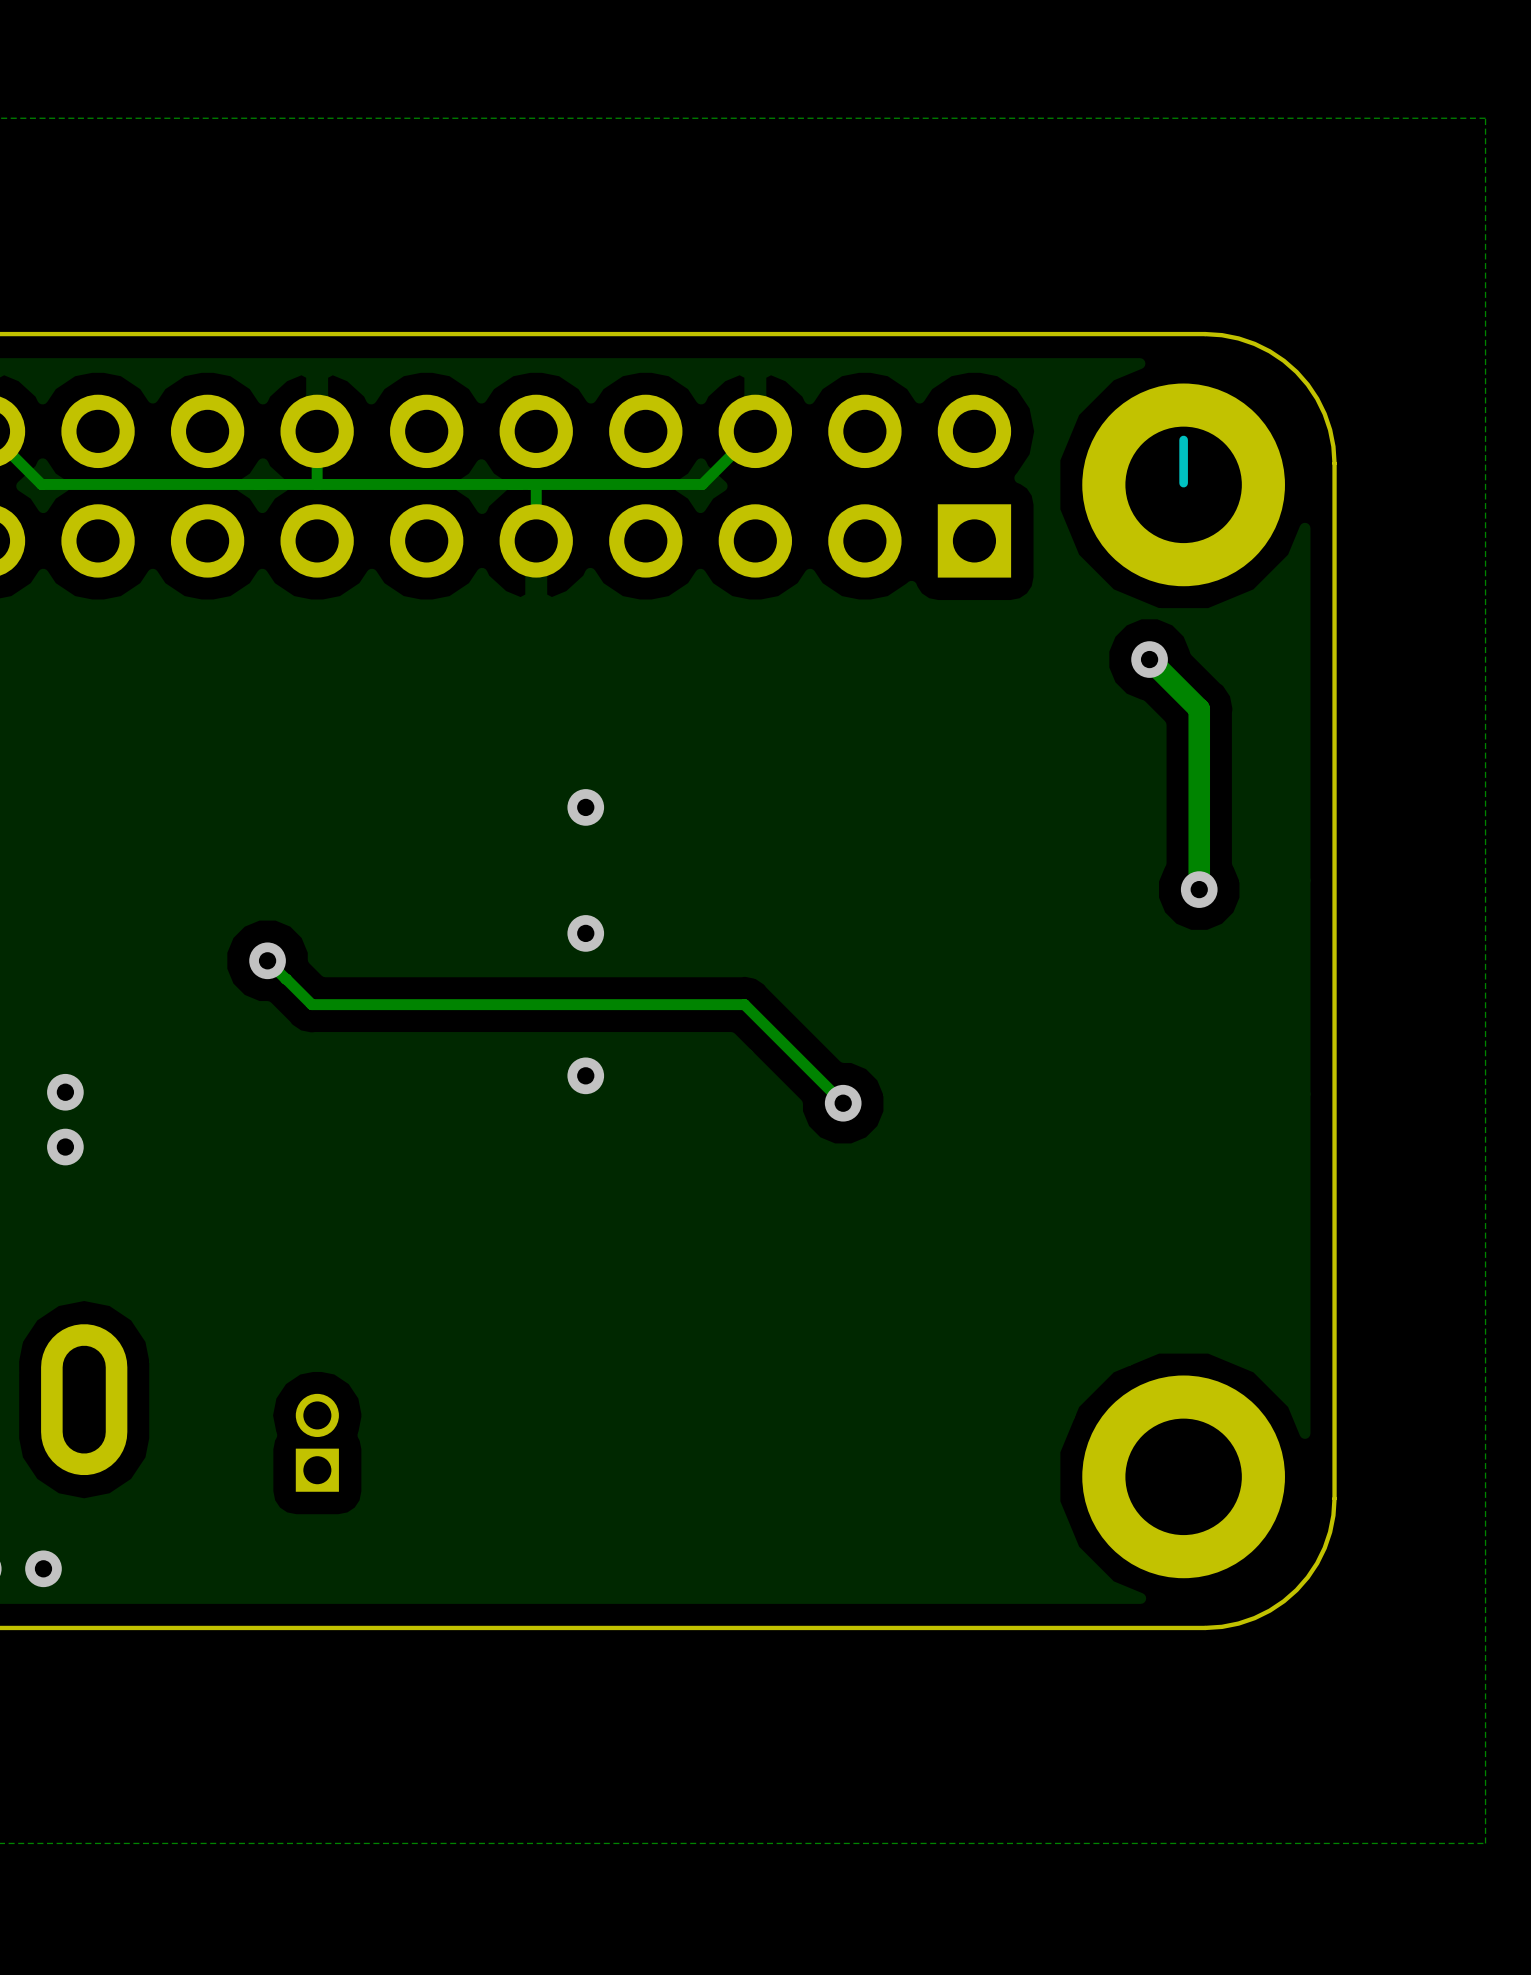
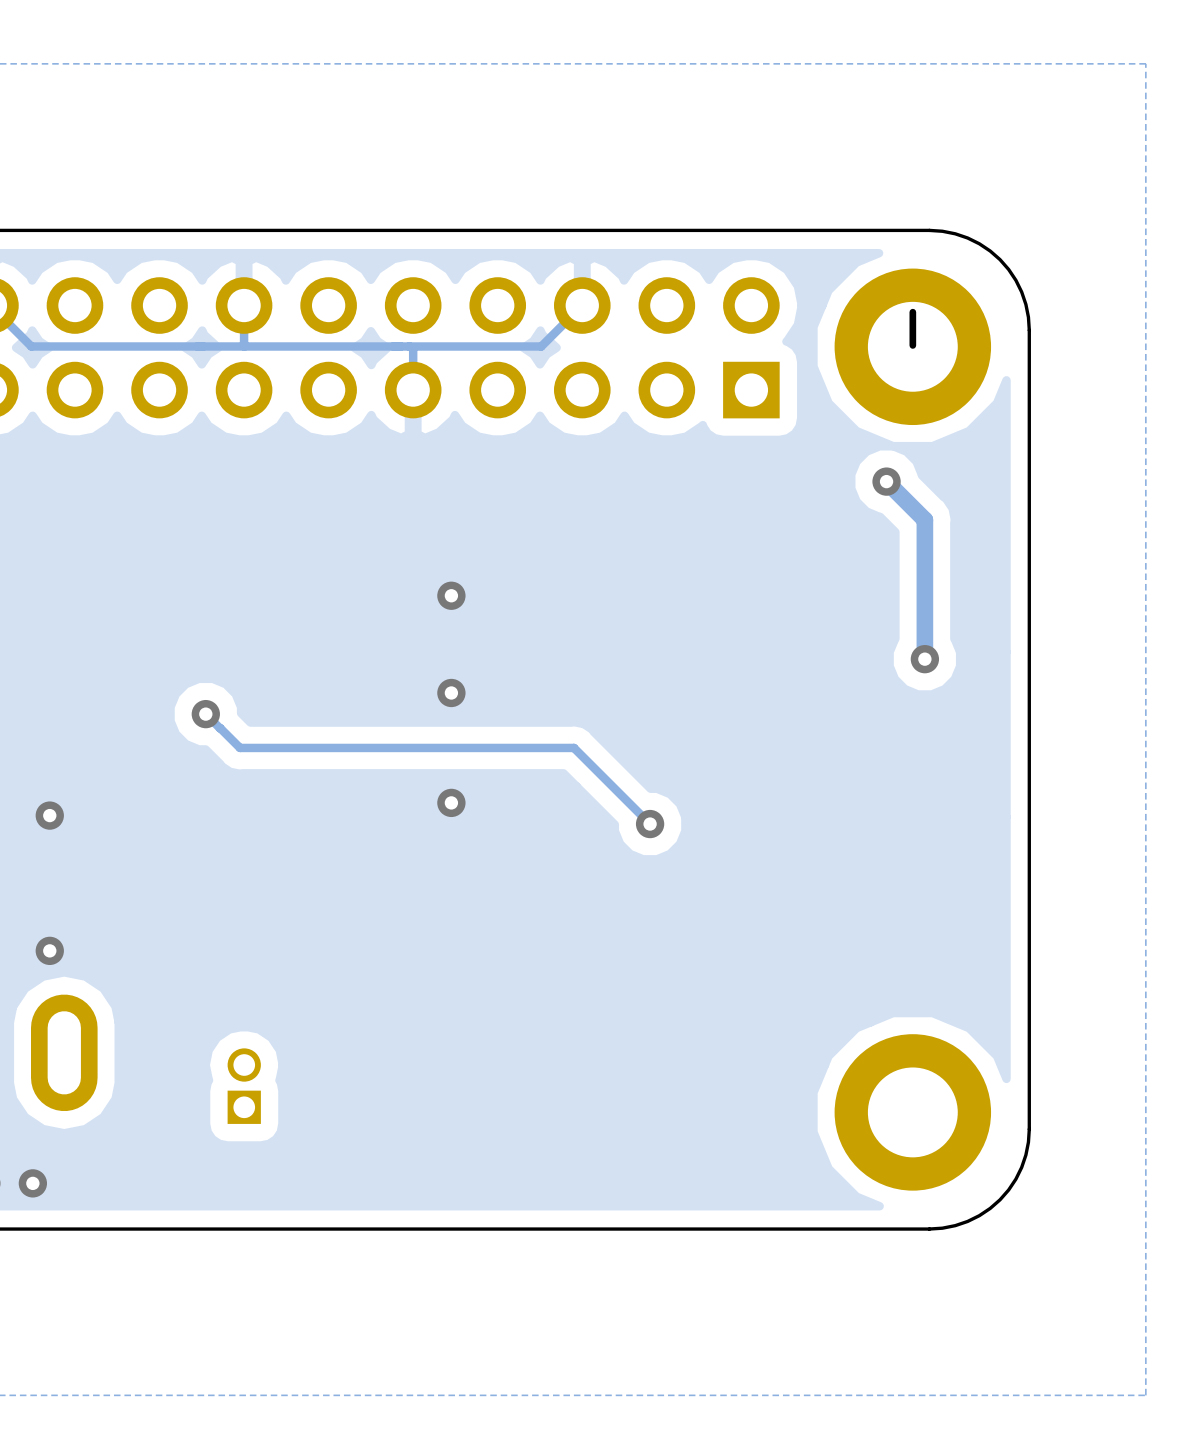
via position: (65, 1147) -> (49, 950)

